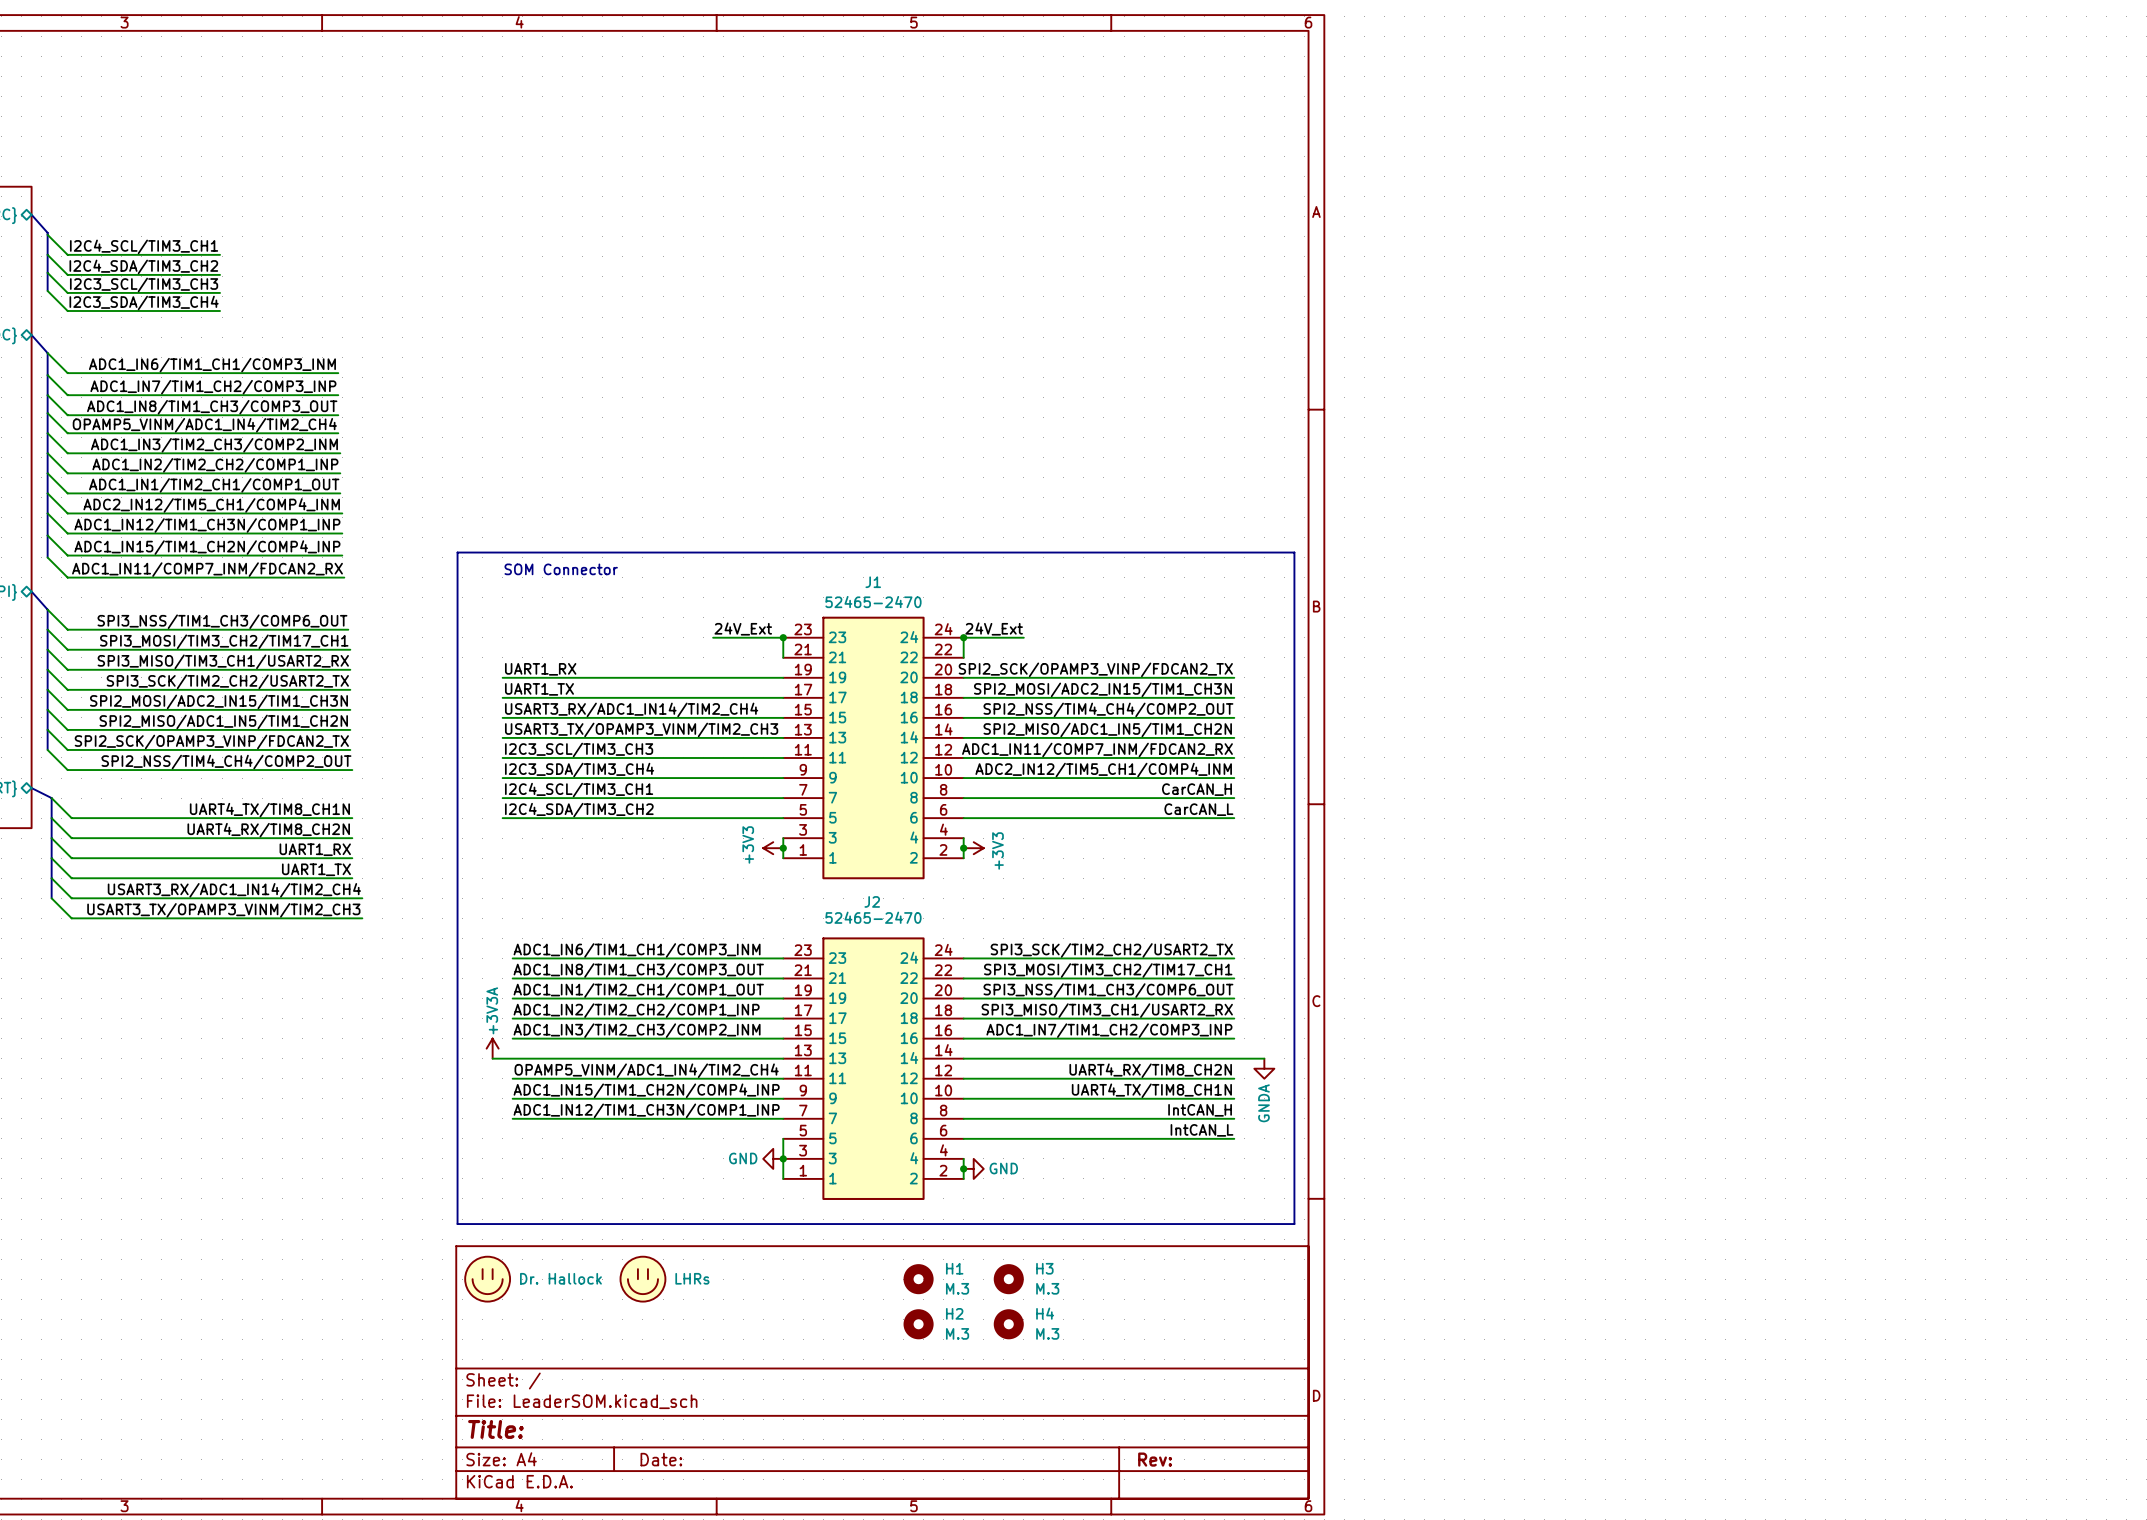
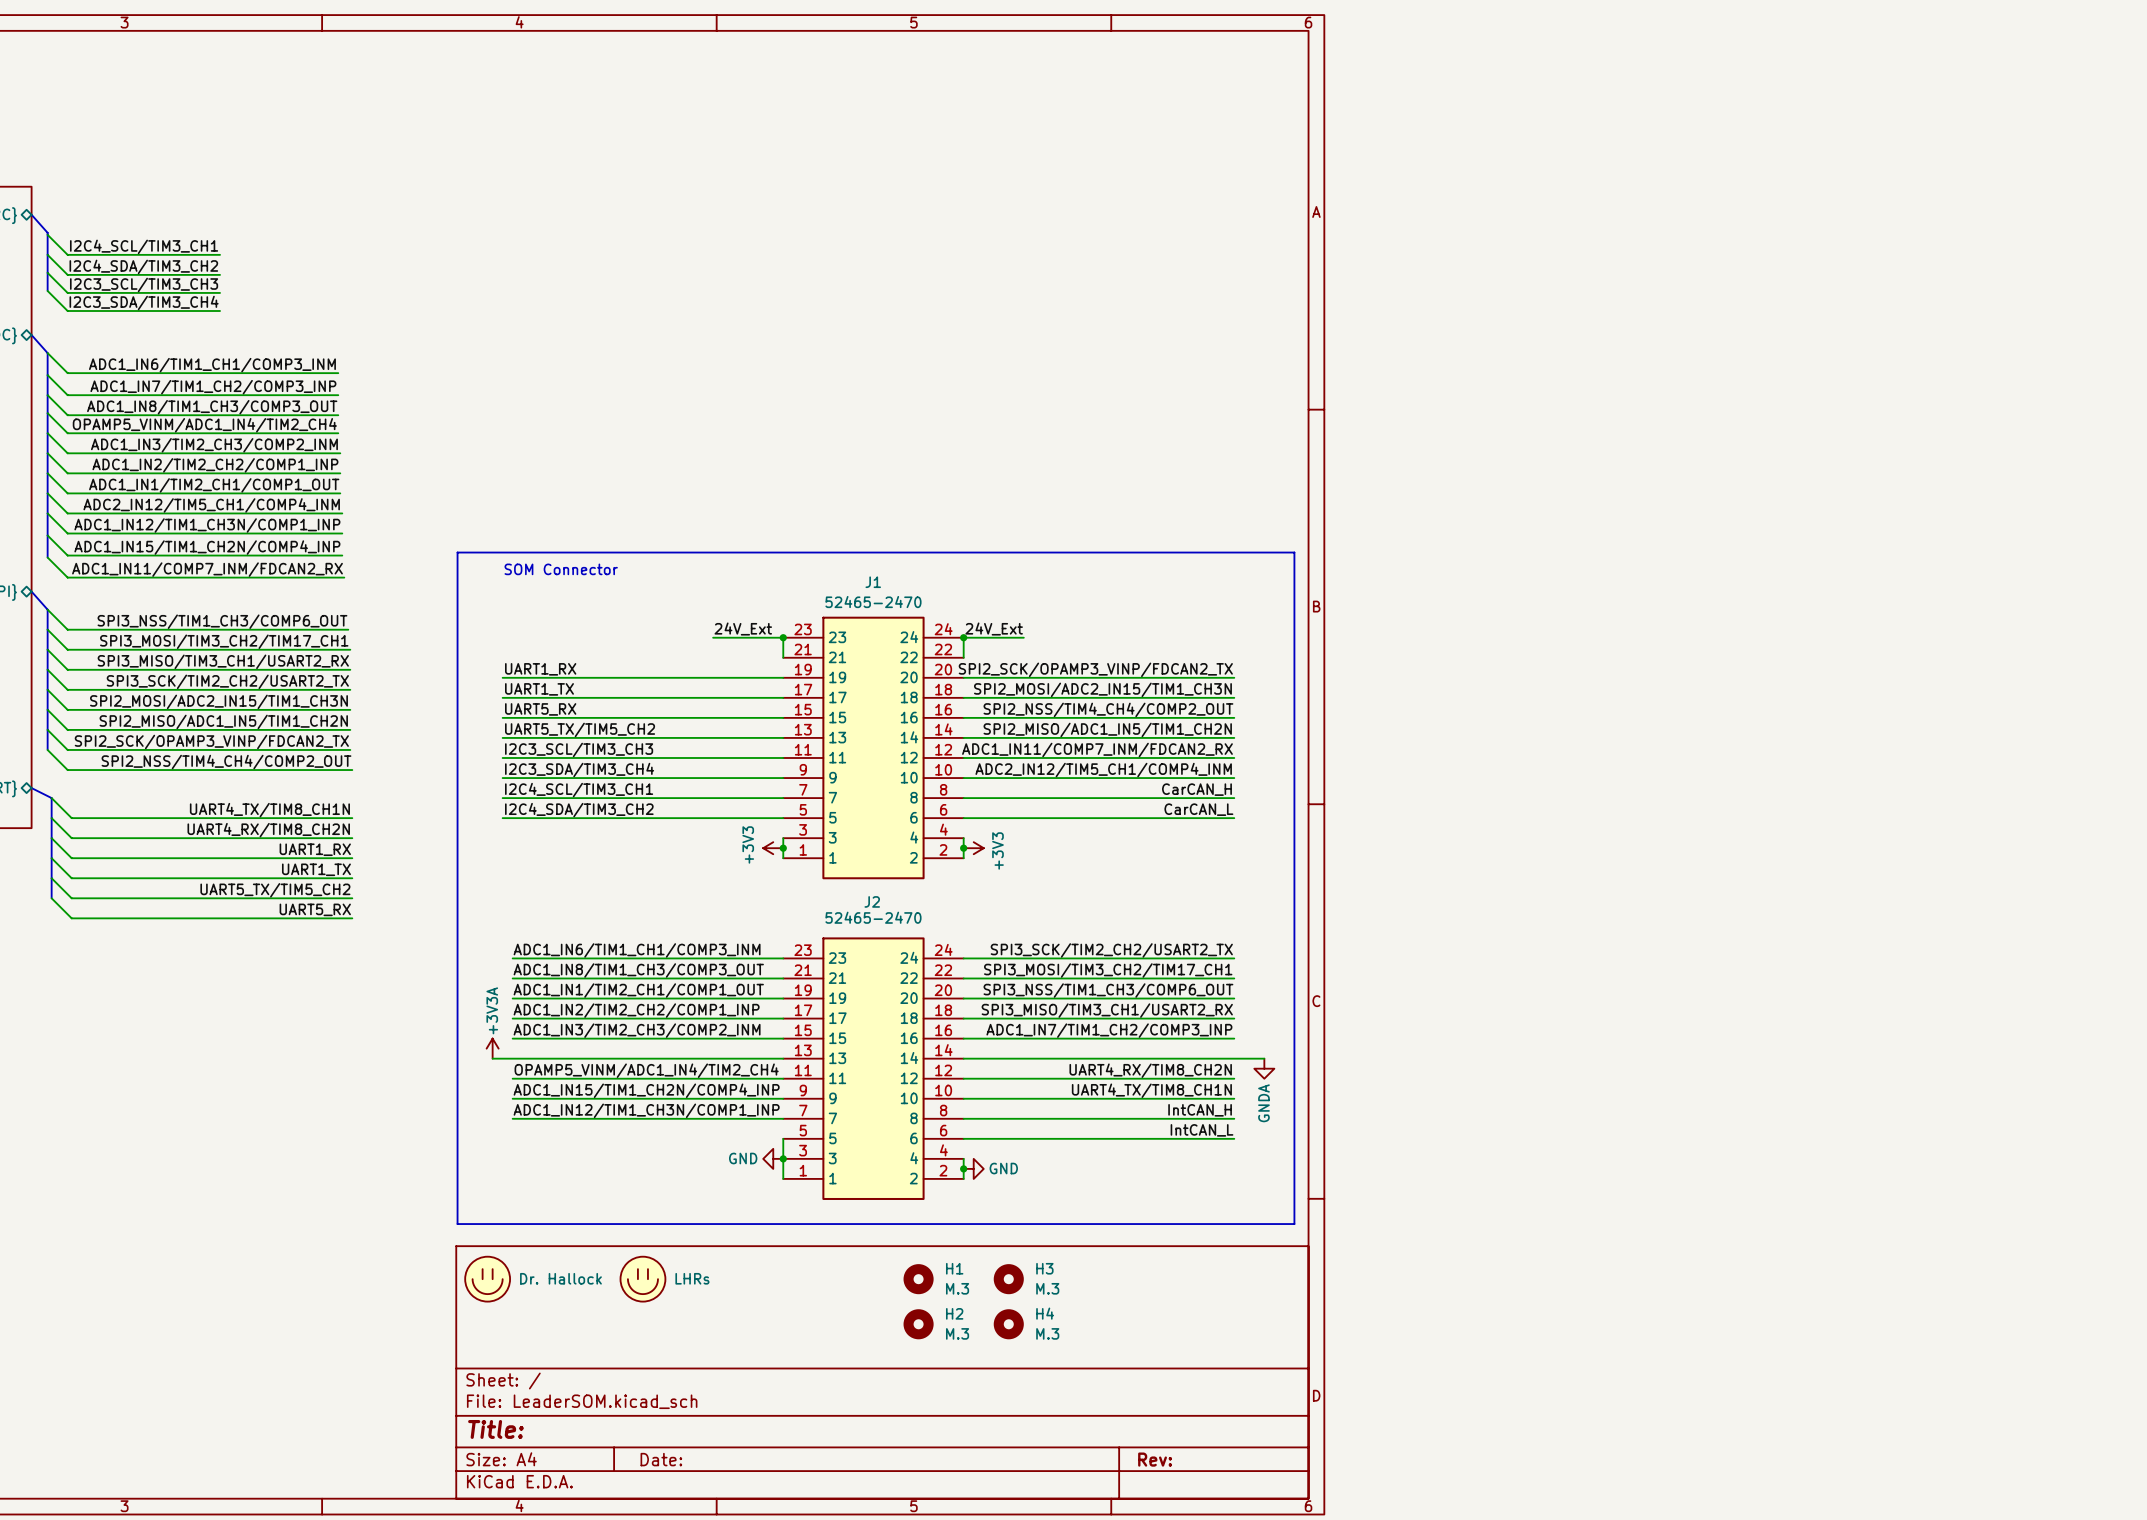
label: USART3_RX/ADC1_IN14/TIM2_CH4 (631, 709) -> UART5_RX (540, 709)
label: USART3_TX/OPAMP3_VINM/TIM2_CH3 (641, 729) -> UART5_TX/TIM5_CH2 (580, 729)
label: USART3_RX/ADC1_IN14/TIM2_CH4 (234, 890) -> none
label: none -> UART5_TX/TIM5_CH2 (275, 890)
wire: (352, 898) (362, 898) -> none
label: none -> UART5_RX (315, 909)
label: USART3_TX/OPAMP3_VINM/TIM2_CH3 (223, 910) -> none
wire: (352, 918) (362, 918) -> none

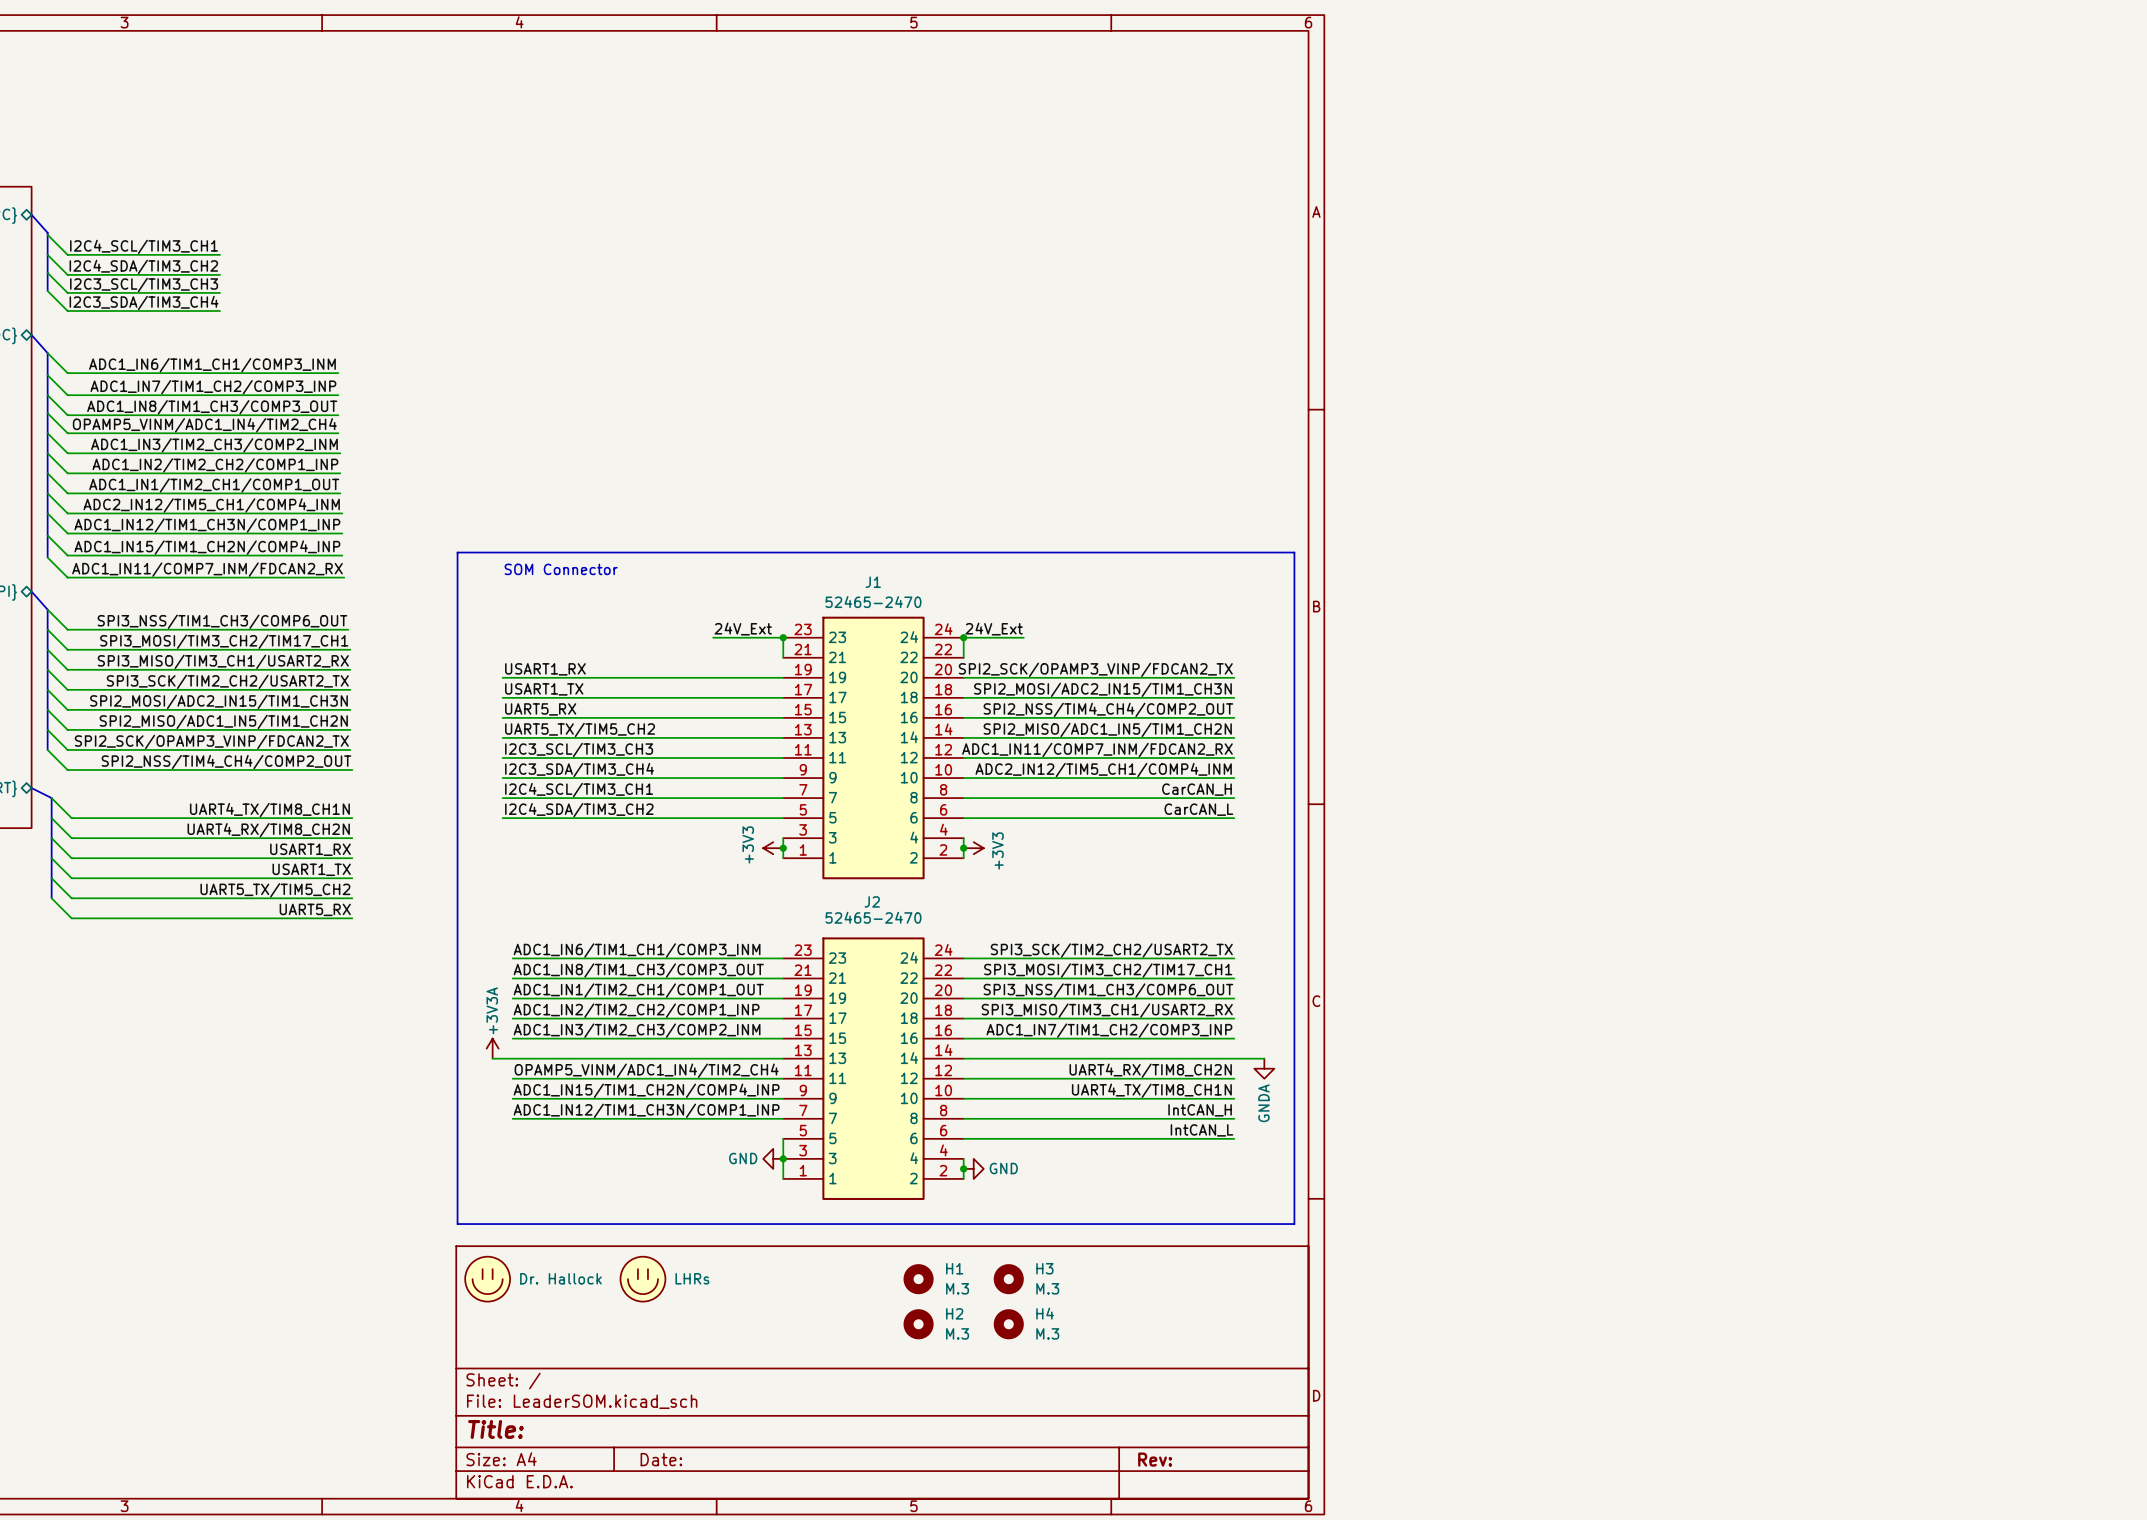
label: UART1_RX (540, 669) -> USART1_RX (545, 669)
label: UART1_TX (539, 689) -> USART1_TX (544, 689)
label: UART1_RX (315, 849) -> USART1_RX (310, 849)
label: UART1_TX (316, 869) -> USART1_TX (311, 869)

